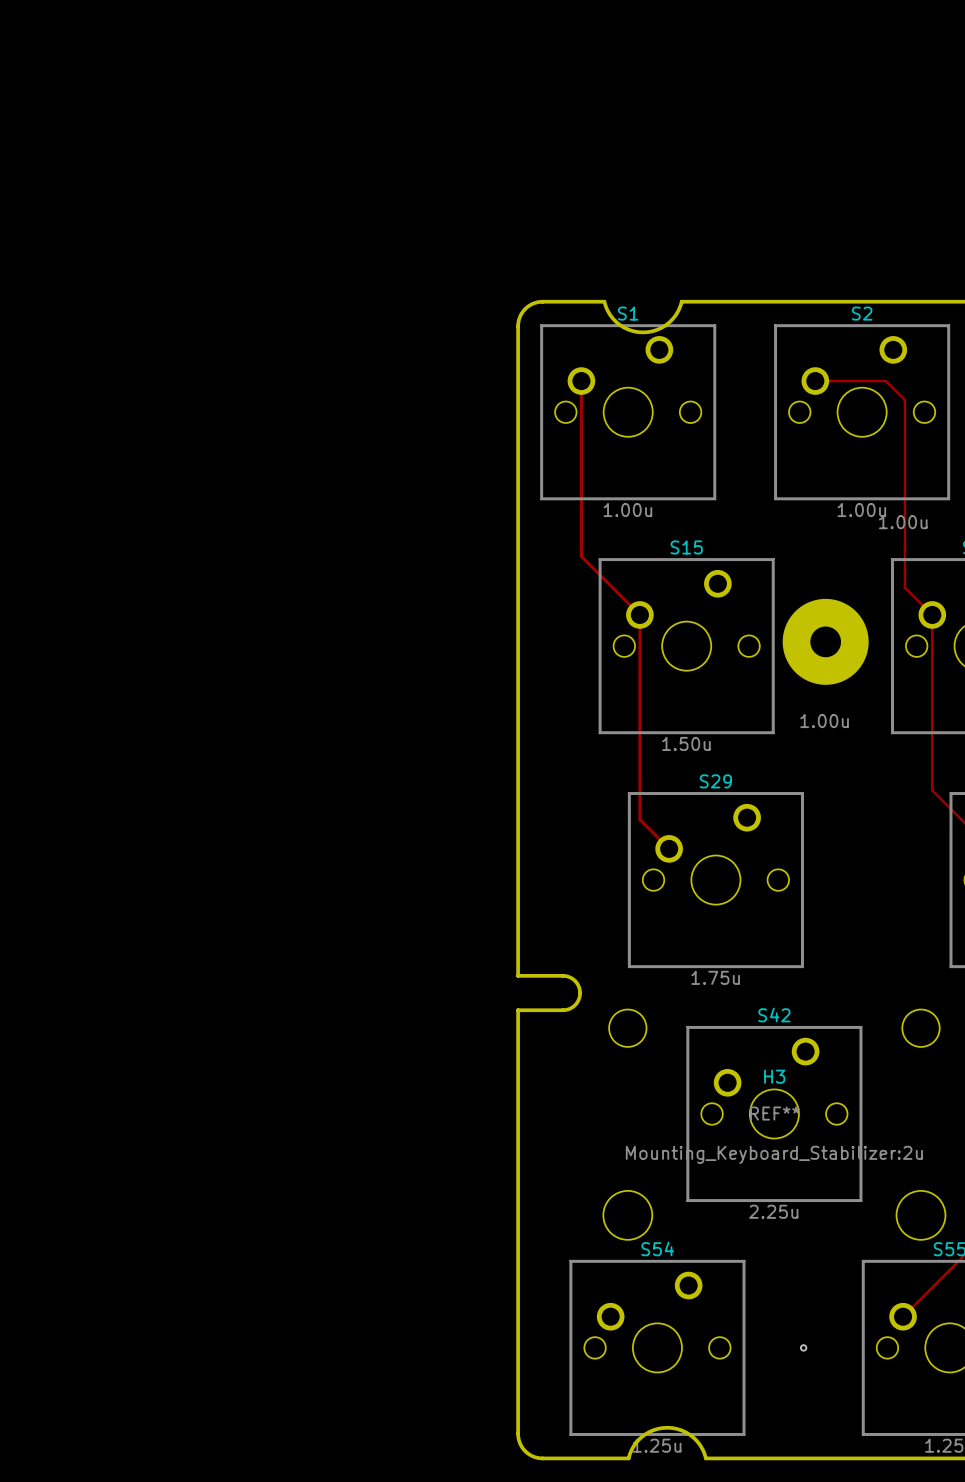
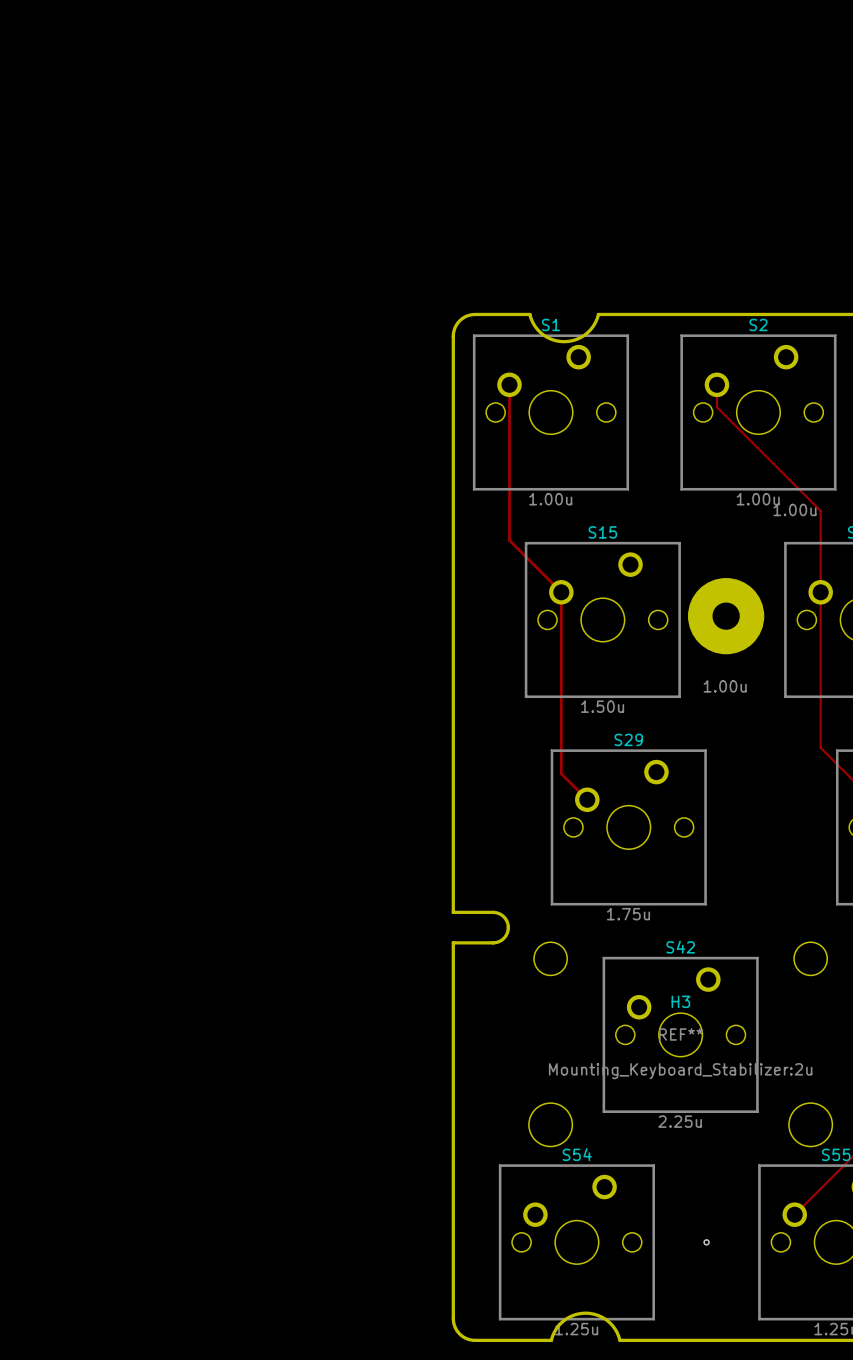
track: (815, 381) (885, 381) (904, 400) (904, 587) (932, 614) -> (716, 384) (716, 407) (820, 510) (820, 592)

